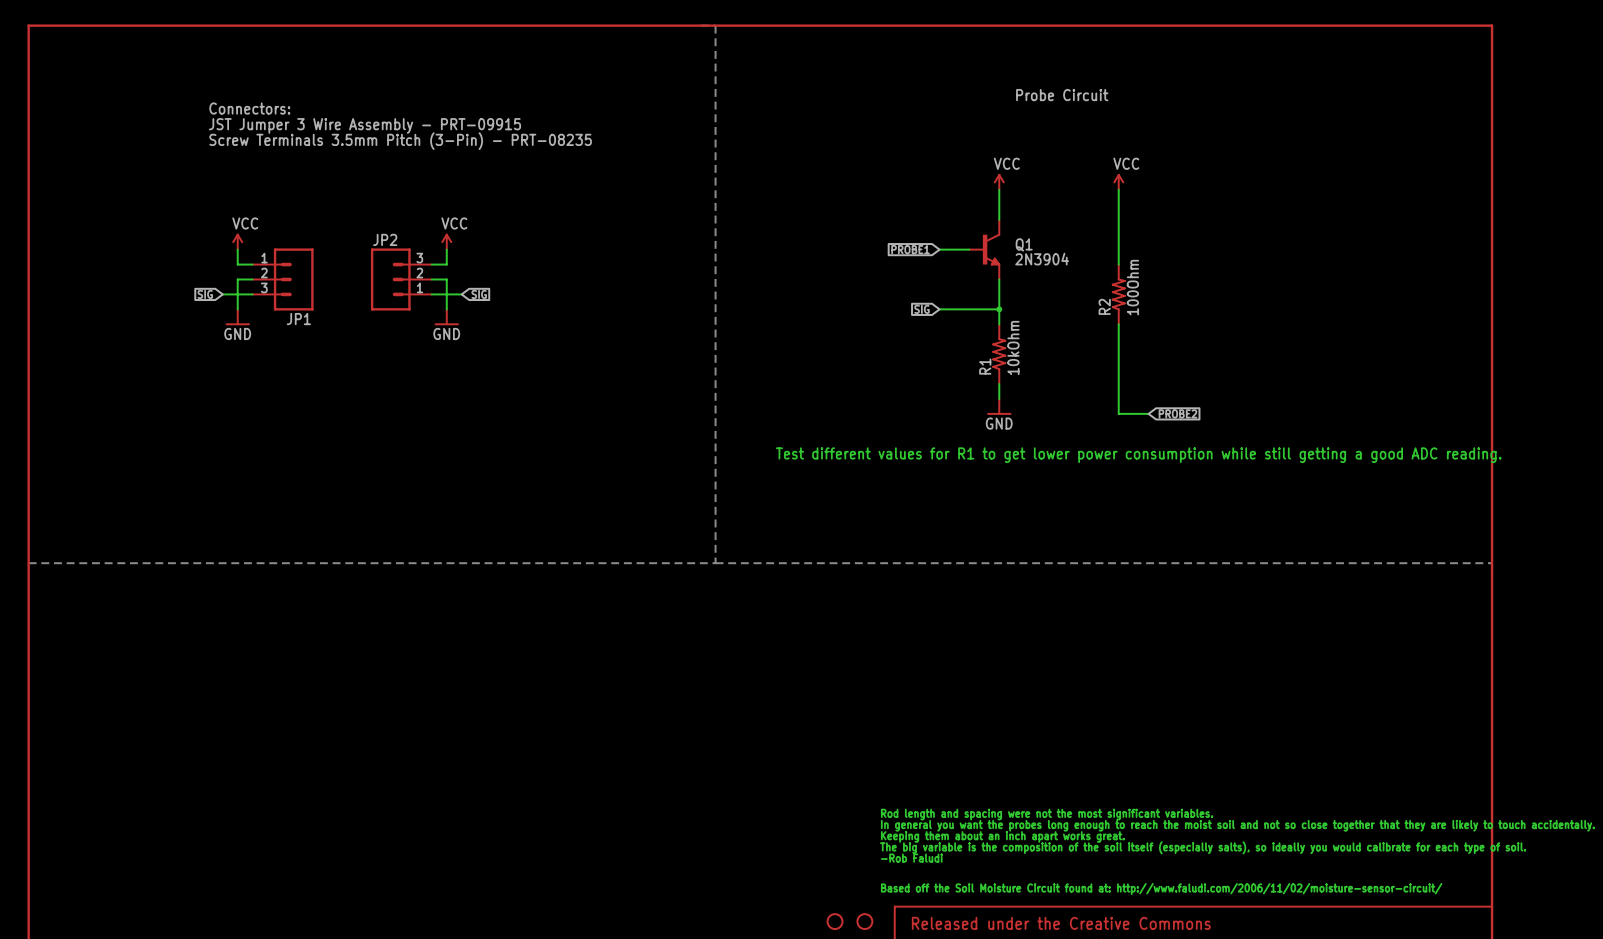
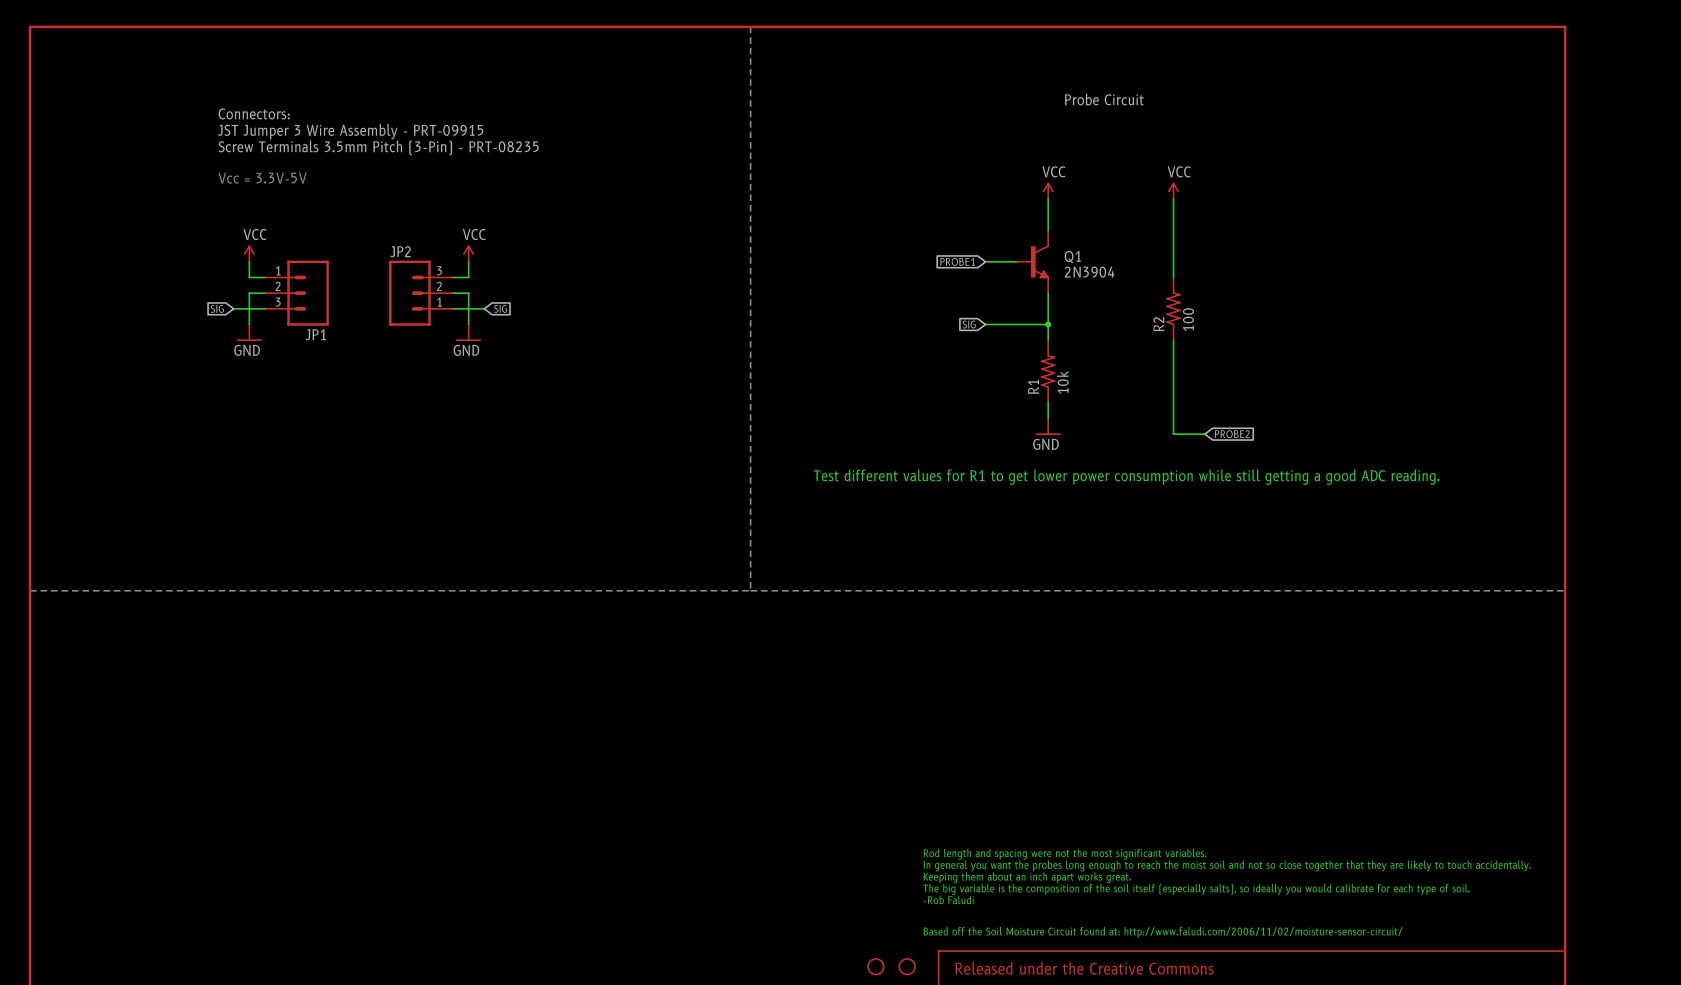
text: none -> Vcc = 3.3V-5V (262, 178)
R2 value: 100Ohm (1132, 287) -> 100 (1188, 319)
R1 value: 10kOhm (1013, 348) -> 10k (1062, 382)

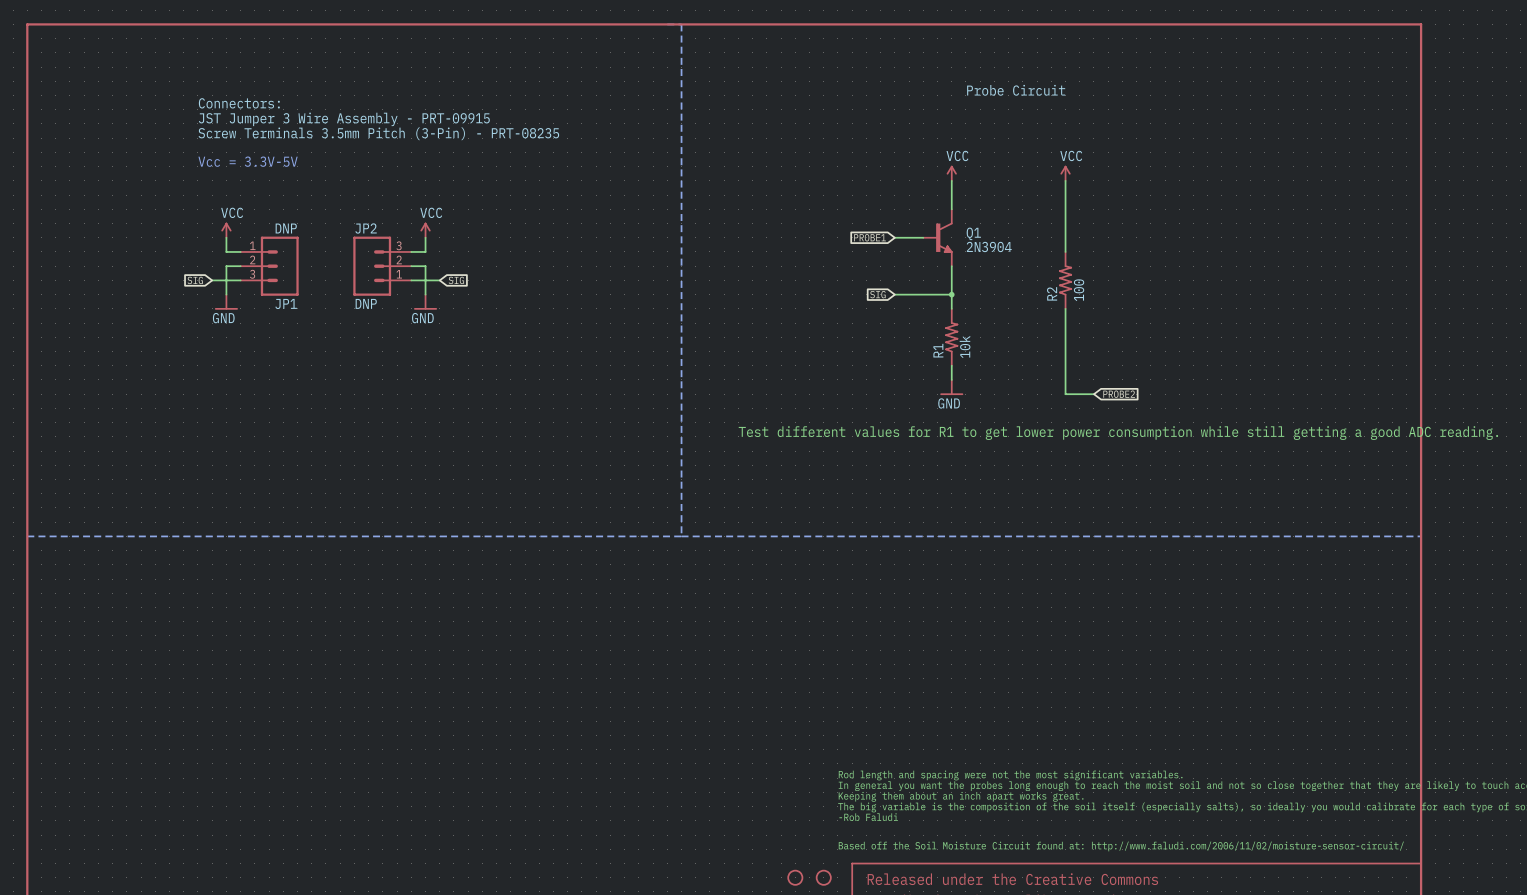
JP1 value: none -> DNP (286, 228)
JP2 value: none -> DNP (366, 303)

